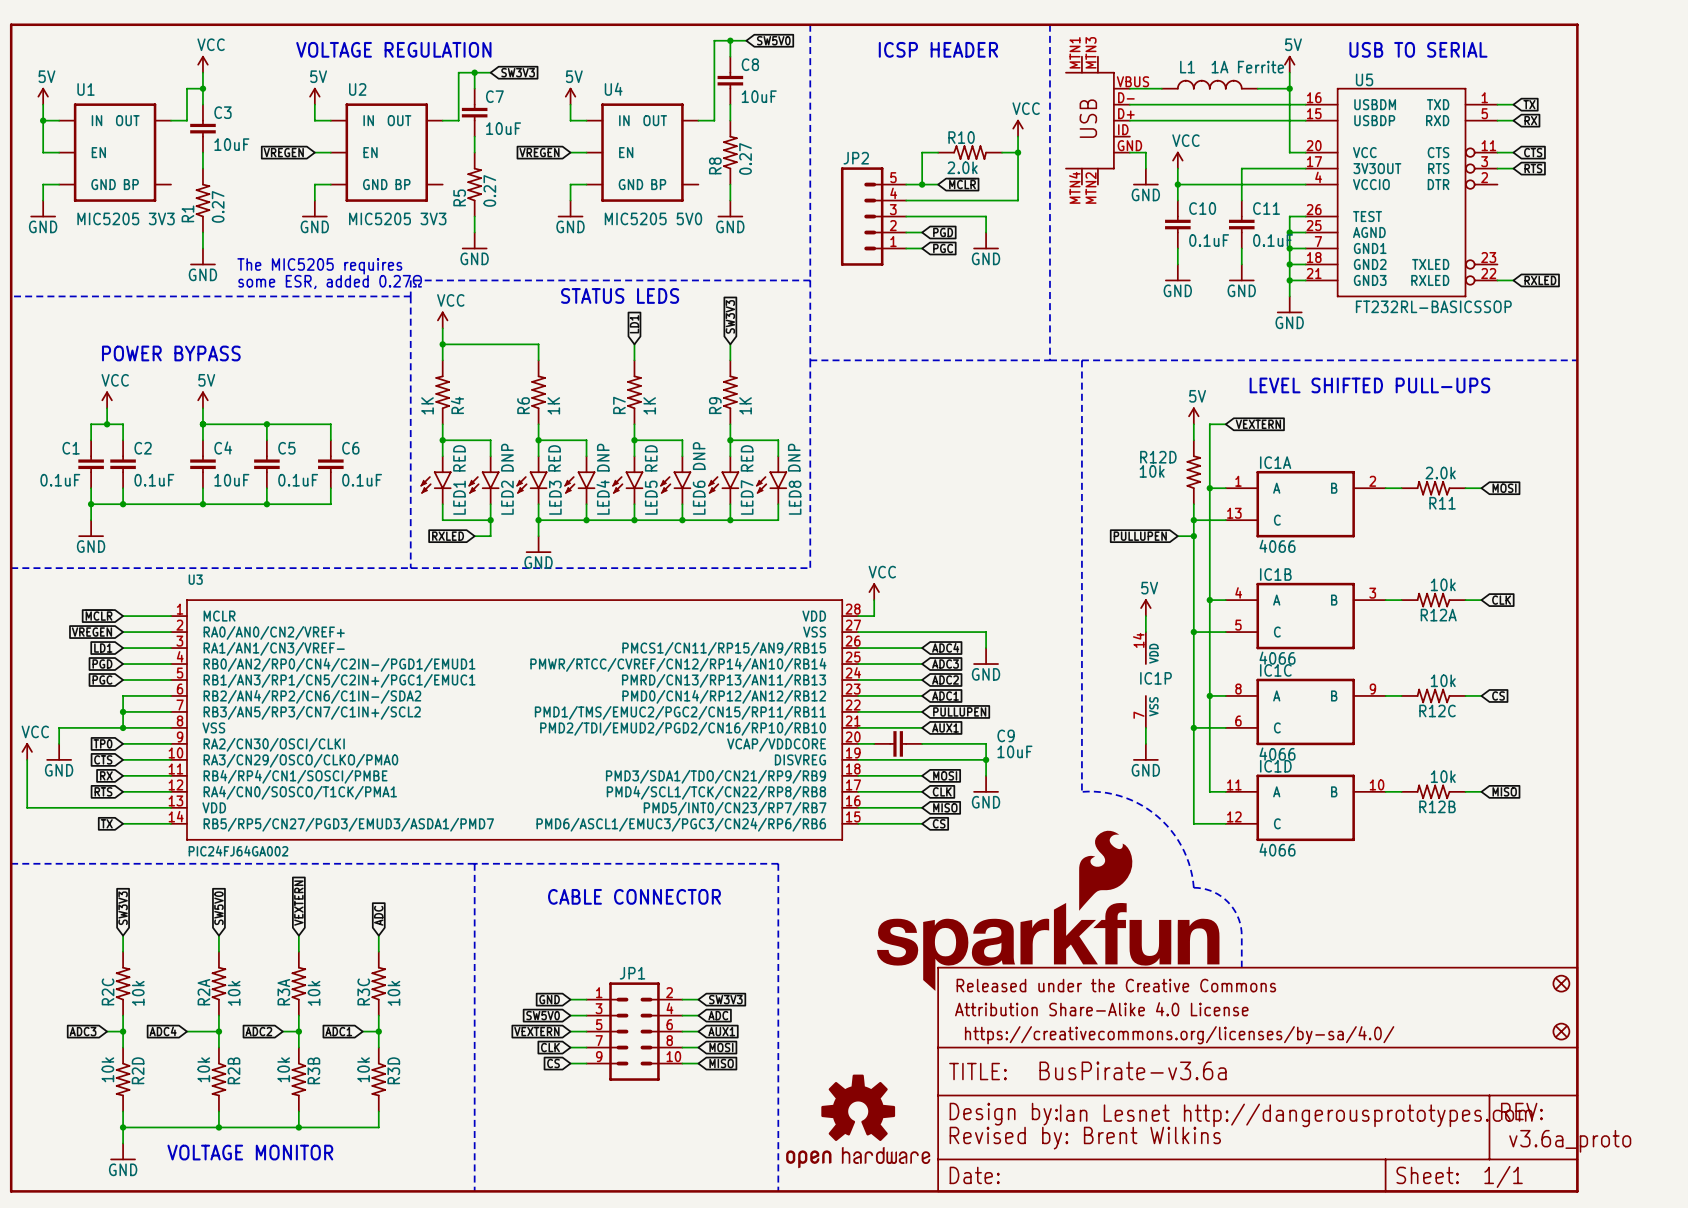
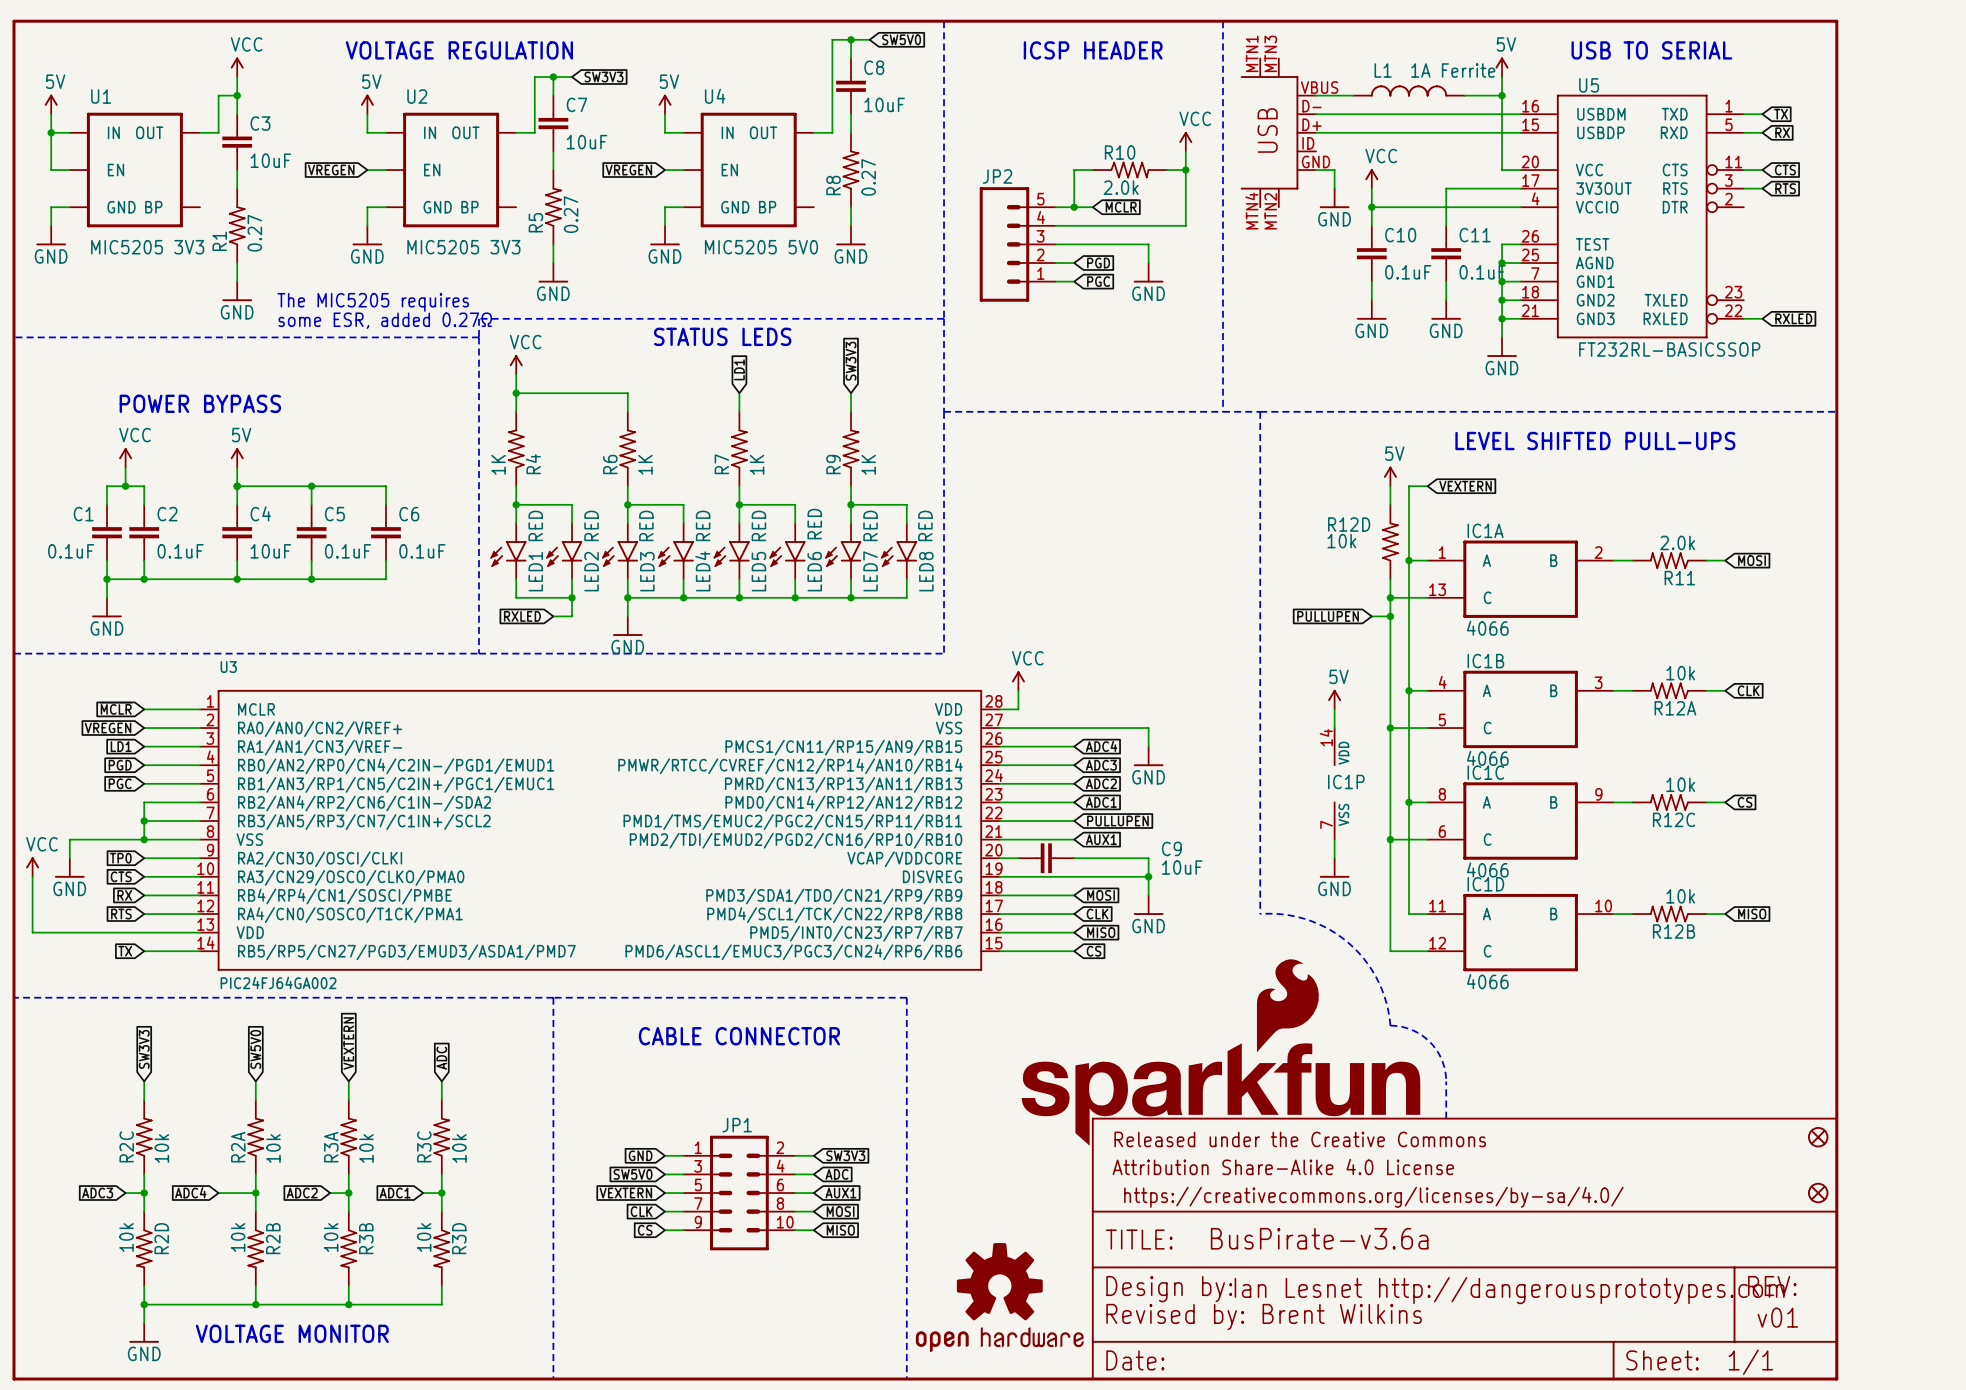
LED6 value: DNP (699, 456) -> RED (814, 524)
LED2 value: DNP (507, 457) -> RED (591, 525)
LED4 value: DNP (603, 457) -> RED (703, 525)
LED8 value: DNP (794, 457) -> RED (925, 525)
text: v3.6a_proto (1570, 1141) -> v01 (1777, 1317)

